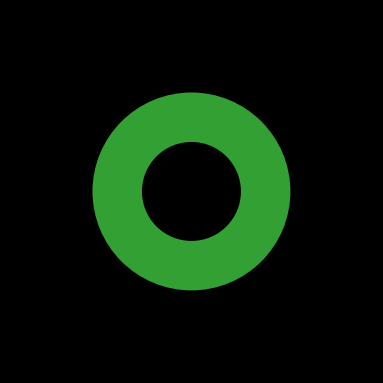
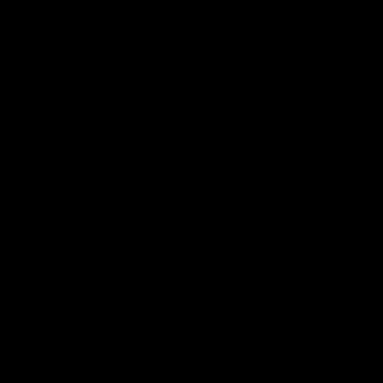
part: (191, 191) -> none

